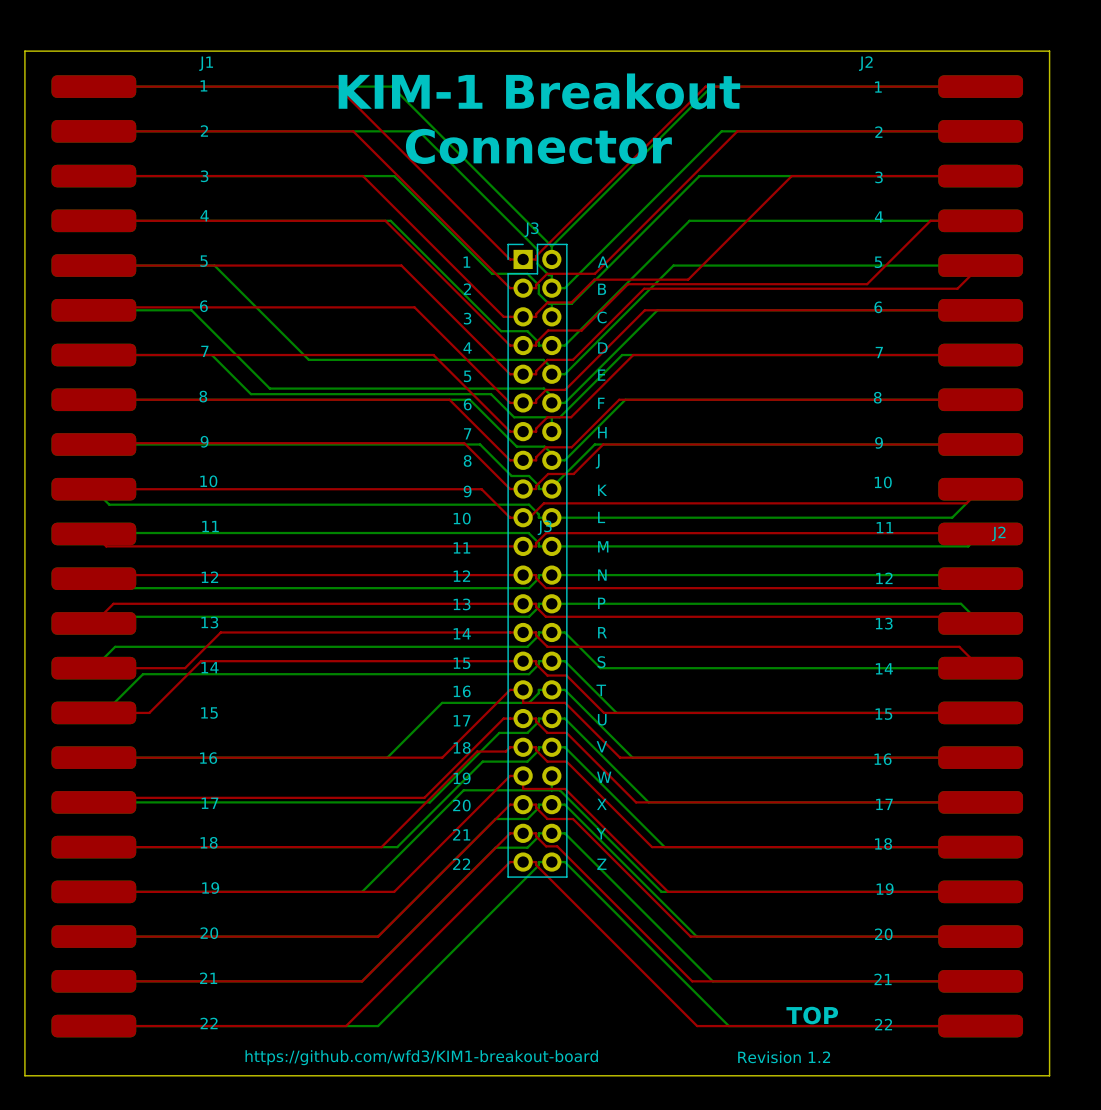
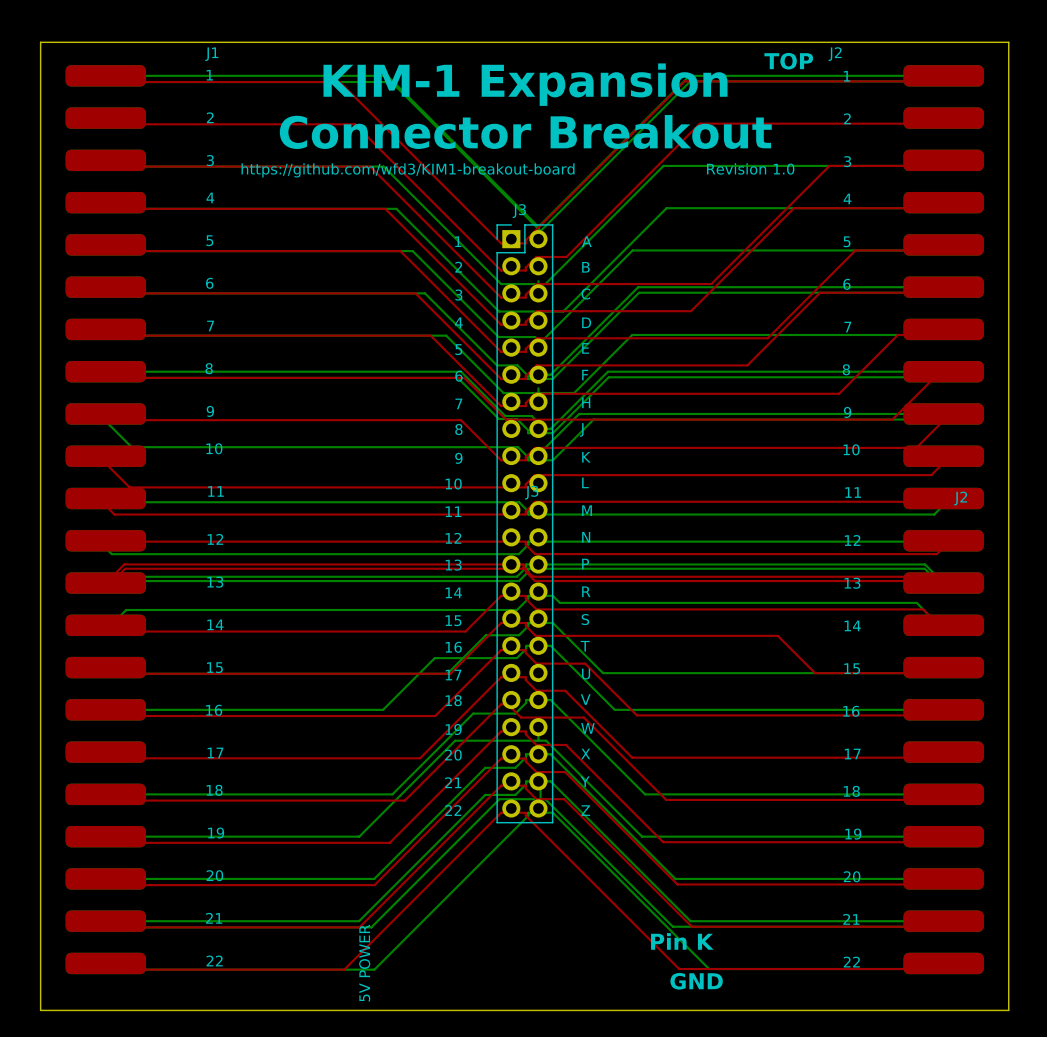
text: none -> TOP (788, 61)
top track: (93, 86) (337, 86) (510, 259) (536, 259) (536, 256) (705, 86) (980, 86) -> none
text: KIM-1 Breakout (539, 91) -> KIM-1 Expansion (525, 84)
bottom track: none -> (944, 81) (690, 81) (540, 231) (391, 82) (104, 82)
top track: none -> (944, 81) (684, 81) (525, 240) (525, 243) (501, 243) (339, 82) (104, 82)
bottom track: (93, 131) (419, 131) (537, 249) (537, 263) (548, 275) (551, 275) (551, 288) (564, 288) (721, 131) (980, 131) -> none
top track: (93, 131) (353, 131) (510, 288) (536, 288) (536, 284) (547, 273) (594, 273) (737, 131) (980, 131) -> none
top track: none -> (944, 123) (699, 123) (566, 256) (536, 256) (525, 267) (525, 270) (501, 270) (354, 124) (104, 124)
text: Connector (538, 146) -> Connector Breakout (525, 131)
bottom track: (93, 176) (394, 176) (492, 273) (527, 273) (538, 285) (538, 293) (548, 303) (571, 303) (699, 176) (980, 176) -> none
top track: (93, 176) (362, 176) (503, 316) (536, 316) (536, 314) (547, 302) (571, 302) (594, 279) (688, 279) (791, 176) (980, 176) -> none
bottom track: none -> (944, 165) (663, 165) (545, 284) (501, 284) (383, 166) (104, 166)
top track: none -> (944, 165) (829, 165) (711, 284) (536, 284) (525, 294) (525, 297) (501, 297) (370, 166) (104, 166)
text: none -> Revision 1.0 (750, 168)
text: none -> https://github.com/wfd3/KIM1-breakout-board (408, 170)
bottom track: (93, 220) (390, 220) (501, 331) (527, 331) (538, 342) (538, 345) (564, 345) (689, 220) (980, 220) -> none
top track: (93, 220) (385, 220) (510, 345) (536, 345) (536, 342) (548, 330) (581, 330) (628, 284) (867, 284) (930, 220) (980, 220) -> none
bottom track: none -> (944, 208) (666, 208) (563, 311) (499, 311) (396, 208) (104, 208)
top track: none -> (944, 208) (793, 208) (690, 311) (536, 311) (525, 321) (525, 324) (501, 324) (385, 208) (104, 208)
bottom track: (93, 265) (214, 265) (308, 359) (543, 359) (557, 374) -> none
top track: (93, 265) (401, 265) (510, 374) (536, 374) (536, 371) (547, 359) (573, 359) (644, 288) (957, 288) (980, 265) -> none
bottom track: (980, 265) (673, 265) (564, 374) (551, 374) -> none
bottom track: none -> (944, 250) (632, 250) (540, 342) (535, 337) (498, 337) (412, 251) (104, 251)
top track: none -> (944, 250) (855, 250) (767, 338) (536, 338) (525, 348) (525, 351) (501, 351) (400, 251) (104, 251)
bottom track: (93, 310) (191, 310) (269, 388) (543, 388) (558, 402) -> none
top track: (93, 310) (96, 307) (414, 307) (510, 402) (536, 402) (536, 399) (546, 389) (565, 389) (644, 310) (980, 310) -> none
bottom track: none -> (944, 292) (639, 292) (552, 378) (528, 378) (528, 376) (517, 365) (497, 365) (424, 293) (104, 293)
top track: none -> (944, 292) (820, 292) (747, 365) (536, 365) (525, 376) (525, 378) (501, 378) (415, 293) (104, 293)
bottom track: (93, 355) (211, 355) (251, 394) (491, 394) (514, 417) (559, 417) (622, 355) (980, 355) -> none
top track: (93, 355) (433, 355) (510, 431) (536, 431) (536, 428) (547, 417) (571, 417) (633, 355) (980, 355) -> none
bottom track: none -> (944, 334) (632, 334) (574, 393) (503, 393) (446, 335) (104, 335)
top track: none -> (944, 334) (897, 334) (839, 393) (534, 393) (525, 403) (525, 406) (501, 406) (430, 335) (104, 335)
top track: (93, 399) (449, 399) (510, 460) (536, 460) (536, 457) (546, 447) (571, 447) (619, 399) (980, 399) -> none
bottom track: none -> (944, 377) (608, 377) (552, 433) (528, 433) (528, 430) (516, 419) (498, 419) (457, 377) (104, 377)
top track: none -> (944, 377) (934, 377) (892, 419) (506, 419) (464, 377) (104, 377)
bottom track: (93, 444) (480, 444) (511, 476) (529, 476) (538, 485) (538, 489) (551, 489) -> none
top track: (93, 444) (464, 443) (510, 489) (536, 489) (536, 485) (548, 473) (573, 473) (603, 444) (980, 444) -> none
bottom track: none -> (944, 419) (593, 419) (552, 460) (528, 460) (528, 457) (518, 447) (131, 447) (104, 420)
top track: none -> (944, 419) (916, 447) (535, 447) (525, 457) (525, 460) (501, 460) (461, 420) (104, 420)
bottom track: (93, 489) (109, 504) (529, 504) (538, 514) (538, 517) (952, 517) (980, 489) -> none
top track: (93, 489) (481, 489) (510, 517) (529, 517) (543, 503) (966, 503) (980, 489) -> none
top track: none -> (944, 461) (931, 475) (534, 475) (525, 484) (525, 487) (129, 487) (104, 462)
bottom track: (93, 533) (528, 533) (538, 543) (538, 546) (968, 546) (980, 533) -> none
top track: (93, 533) (106, 546) (536, 546) (536, 543) (546, 533) (980, 533) -> none
bottom track: none -> (944, 504) (934, 514) (528, 514) (528, 511) (519, 502) (107, 502) (104, 504)
top track: none -> (944, 504) (942, 501) (535, 501) (525, 511) (525, 514) (114, 514) (104, 504)
bottom track: (93, 578) (103, 588) (529, 588) (538, 578) (538, 575) (977, 575) (980, 578) -> none
top track: (93, 578) (97, 575) (536, 575) (536, 578) (545, 588) (971, 588) (980, 578) -> none
bottom track: none -> (944, 546) (939, 541) (528, 541) (528, 544) (518, 554) (111, 554) (104, 546)
top track: none -> (944, 546) (936, 554) (535, 554) (525, 544) (525, 541) (110, 541) (104, 546)
bottom track: none -> (944, 588) (924, 568) (528, 568) (528, 571) (519, 581) (112, 581) (104, 589)
top track: none -> (944, 588) (937, 581) (534, 581) (525, 571) (525, 568) (125, 568) (104, 589)
bottom track: (93, 668) (115, 646) (527, 646) (538, 635) (538, 632) (564, 632) (600, 668) (980, 668) -> none
top track: (93, 668) (185, 668) (220, 632) (536, 632) (536, 635) (547, 646) (959, 646) (980, 668) -> none
bottom track: none -> (944, 630) (916, 602) (559, 602) (552, 595) (528, 595) (528, 598) (517, 610) (126, 610) (104, 631)
top track: none -> (944, 630) (923, 609) (536, 609) (525, 598) (525, 595) (501, 595) (465, 631) (104, 631)
bottom track: (93, 712) (104, 712) (143, 674) (529, 674) (538, 664) (538, 661) (564, 661) (616, 712) (980, 712) -> none
top track: (93, 712) (149, 712) (201, 661) (536, 661) (536, 664) (547, 675) (566, 675) (603, 712) (980, 712) -> none
bottom track: none -> (944, 673) (603, 673) (552, 622) (528, 622) (528, 626) (519, 635) (485, 635) (447, 673) (104, 673)
top track: none -> (944, 673) (815, 673) (777, 635) (535, 635) (525, 625) (525, 622) (501, 622) (450, 673) (104, 673)
top track: none -> (507, 704) (521, 717) (583, 717) (666, 799) (944, 799)
top track: none -> (513, 704) (501, 704) (404, 800) (104, 800)
top track: (93, 757) (442, 757) (510, 689) (523, 689) (523, 702) (565, 702) (620, 757) (980, 757) -> none
top track: none -> (944, 715) (636, 715) (585, 663) (536, 663) (525, 652) (525, 650) (501, 650) (435, 716) (104, 716)
bottom track: (93, 802) (429, 802) (499, 732) (527, 732) (538, 721) (538, 718) (564, 718) (648, 802) (980, 802) -> none
top track: (93, 802) (98, 797) (424, 797) (503, 718) (536, 718) (536, 721) (547, 732) (566, 732) (636, 802) (980, 802) -> none
top track: none -> (944, 757) (632, 757) (565, 690) (536, 690) (525, 680) (525, 677) (501, 677) (420, 758) (104, 758)
bottom track: none -> (540, 785) (540, 799)
top track: (93, 847) (381, 847) (477, 751) (505, 751) (510, 747) (536, 747) (536, 750) (547, 761) (566, 761) (652, 847) (980, 847) -> none
top track: (93, 891) (394, 891) (510, 775) (523, 775) (523, 788) (565, 788) (668, 891) (980, 891) -> none
top track: none -> (944, 842) (663, 842) (566, 744) (536, 744) (525, 734) (525, 731) (501, 731) (389, 842) (104, 842)
top track: (93, 936) (378, 936) (510, 804) (536, 804) (536, 807) (547, 819) (573, 819) (690, 936) (980, 936) -> none
top track: none -> (944, 884) (677, 884) (565, 772) (536, 772) (525, 761) (525, 758) (501, 758) (374, 885) (104, 885)
top track: (93, 981) (362, 981) (510, 833) (536, 833) (536, 836) (546, 846) (557, 846) (692, 981) (980, 981) -> none
bottom track: none -> (944, 926) (672, 926) (545, 799) (499, 799) (371, 927) (104, 927)
top track: none -> (944, 926) (691, 926) (564, 799) (536, 799) (525, 788) (525, 785) (501, 785) (359, 927) (104, 927)
text: none -> Pin K (682, 941)
text: TOP (812, 1015) -> none
text: none -> 5V POWER (364, 963)
bottom track: (93, 1026) (378, 1026) (538, 865) (538, 862) (564, 862) (728, 1026) (980, 1026) -> none
top track: (93, 1026) (346, 1026) (510, 862) (536, 862) (536, 865) (697, 1026) (980, 1026) -> none
bottom track: none -> (944, 969) (709, 969) (552, 812) (528, 812) (528, 815) (374, 969) (104, 969)
top track: none -> (944, 969) (679, 969) (525, 815) (525, 812) (501, 812) (344, 969) (104, 969)
text: none -> GND (696, 981)
text: https://github.com/wfd3/KIM1-breakout-board (421, 1057) -> none
text: Revision 1.2 (784, 1057) -> none

